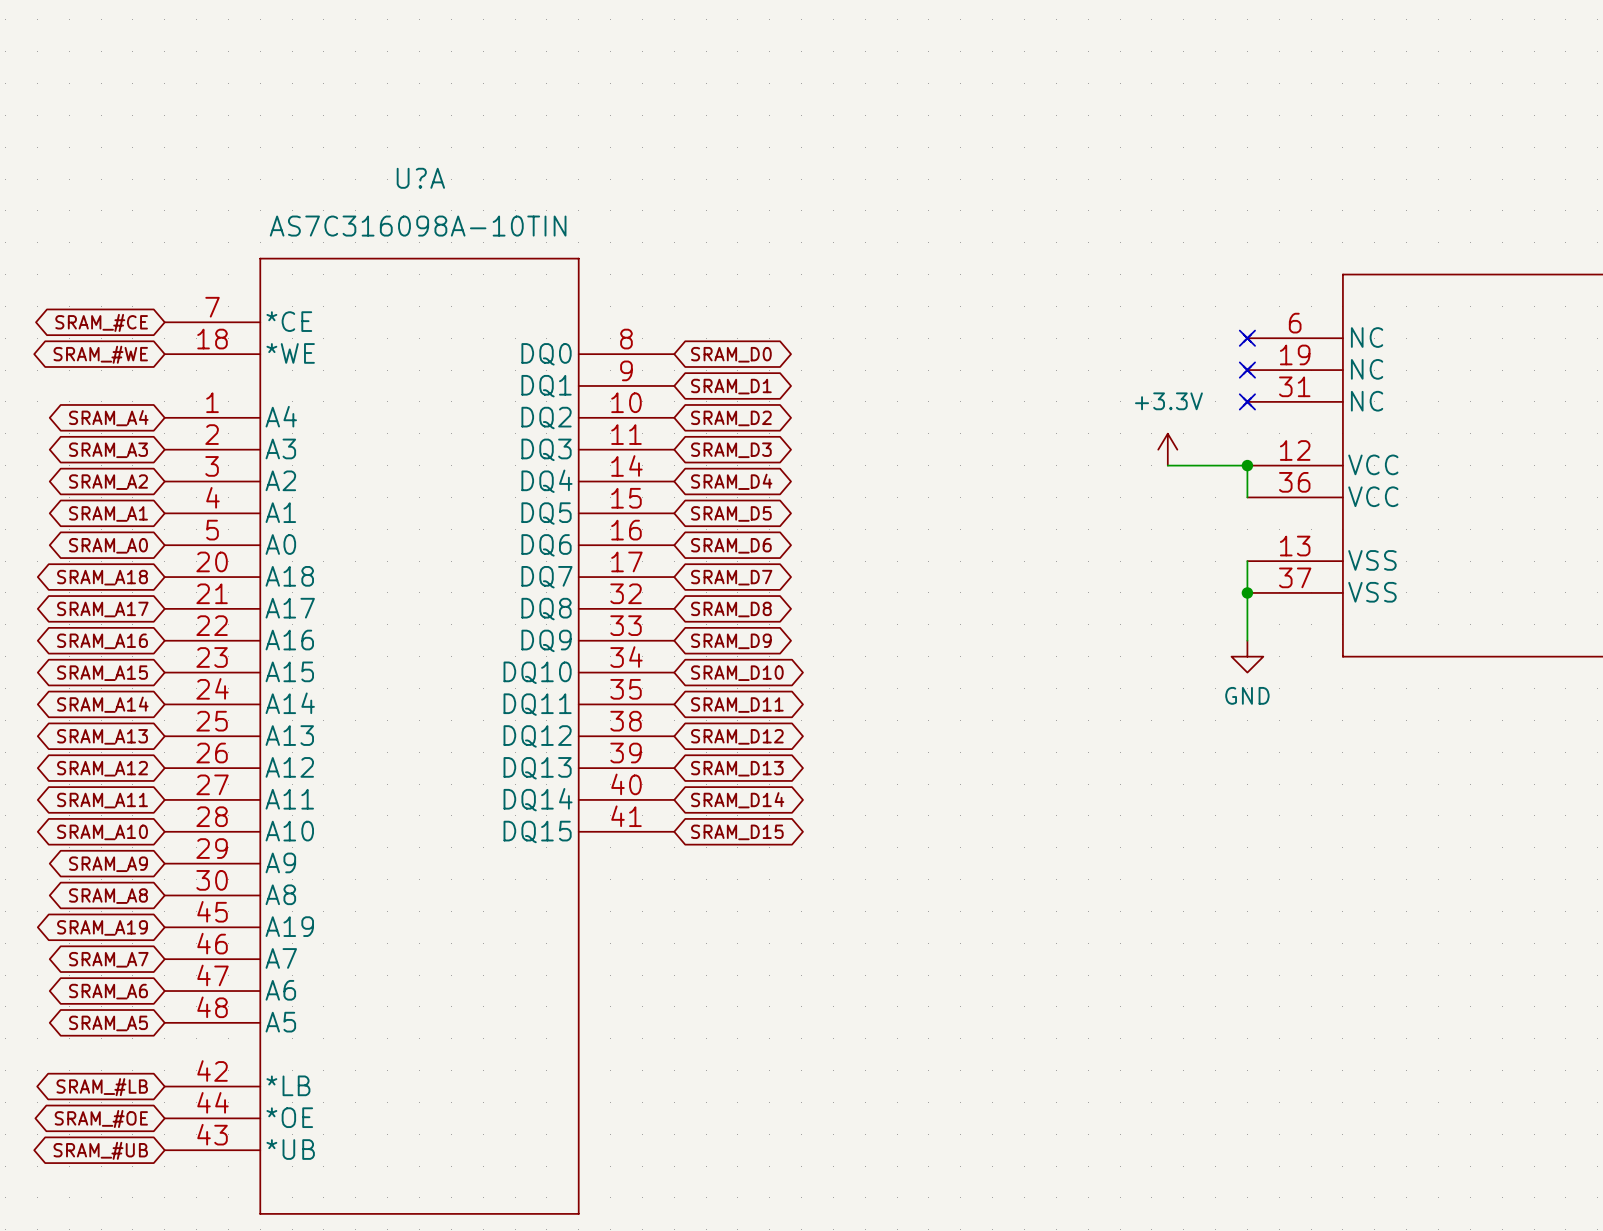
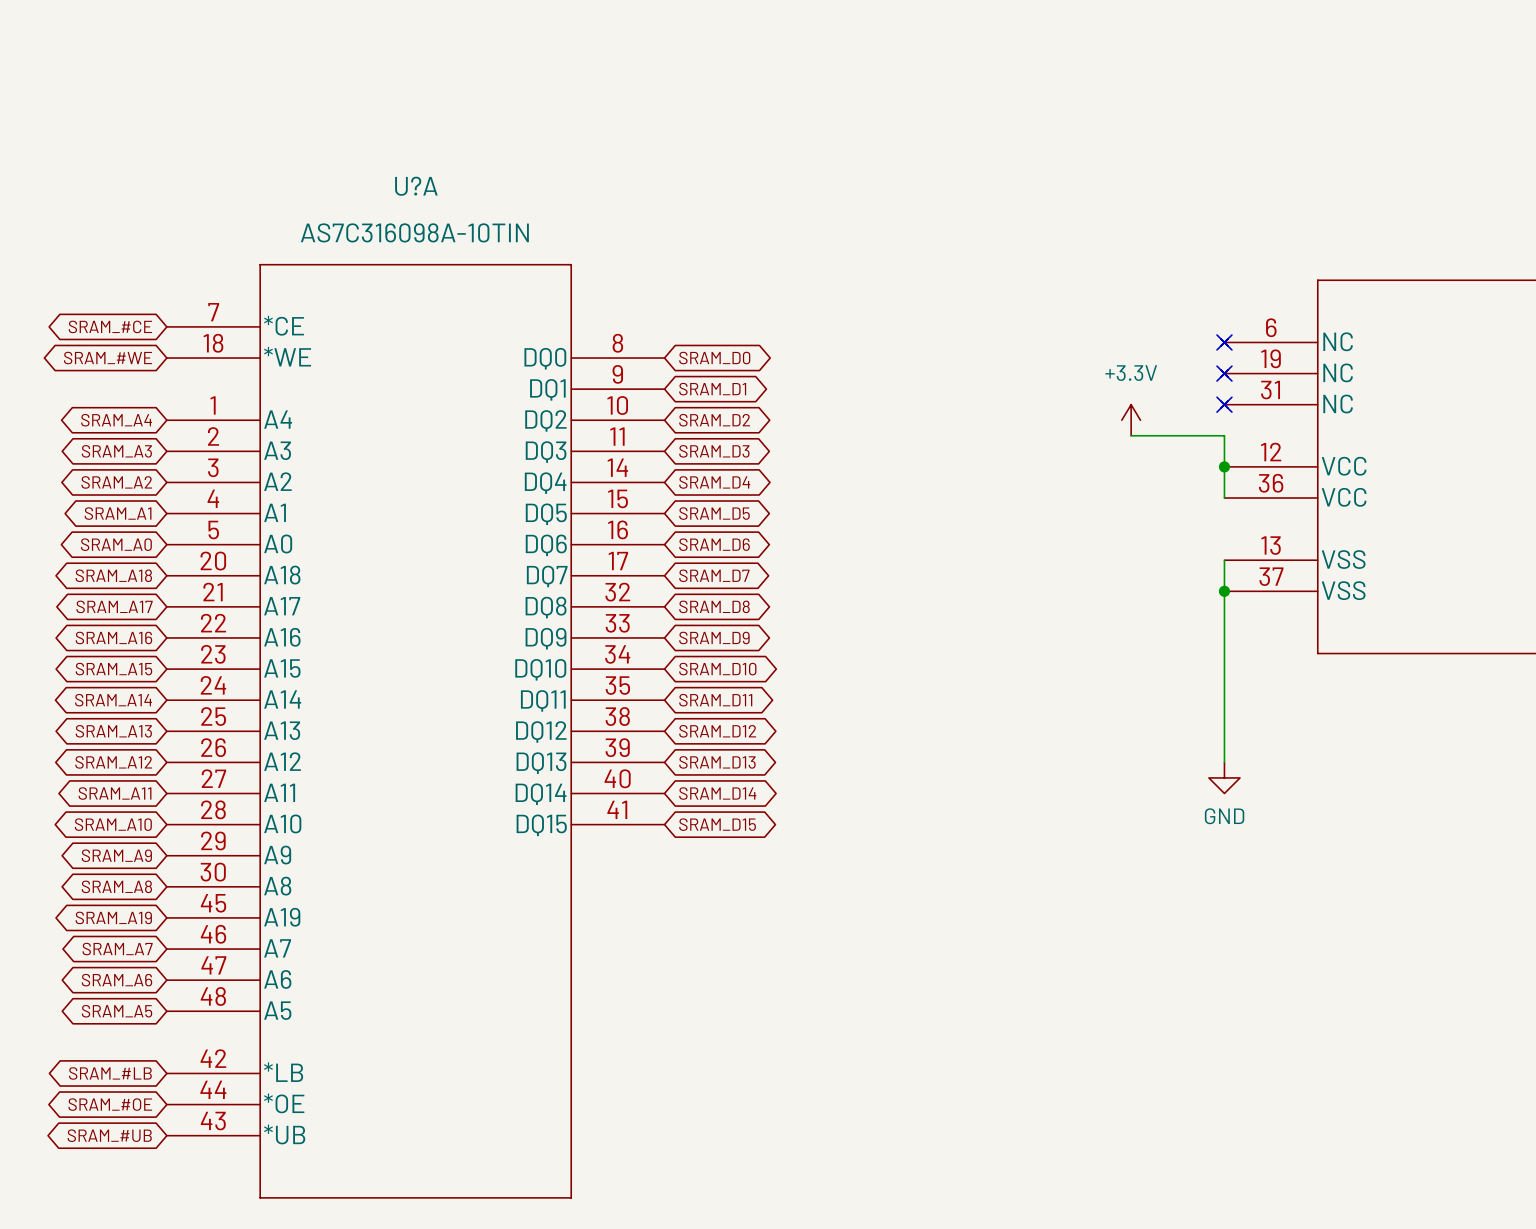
power symbol position: +3.3V (1167, 449) -> +3.3V (1131, 420)
wire: (1167, 465) (1247, 465) -> (1131, 435) (1224, 435) (1224, 466)
wire: none -> (1224, 637) (1224, 762)
power symbol position: GND (1247, 656) -> GND (1224, 777)

